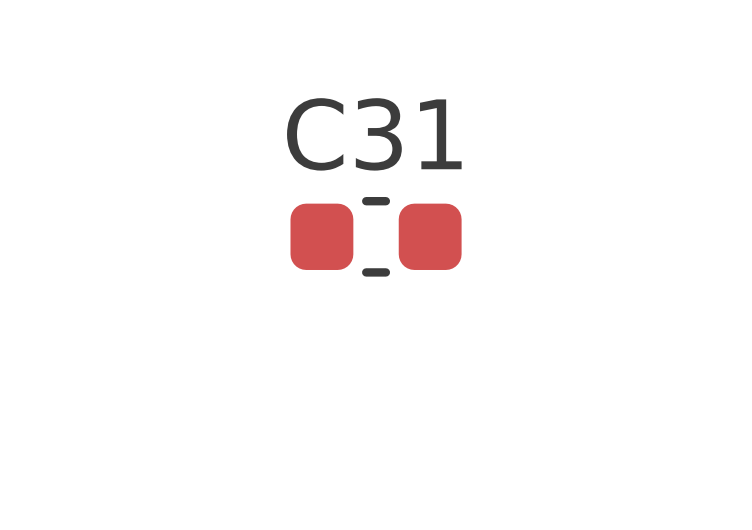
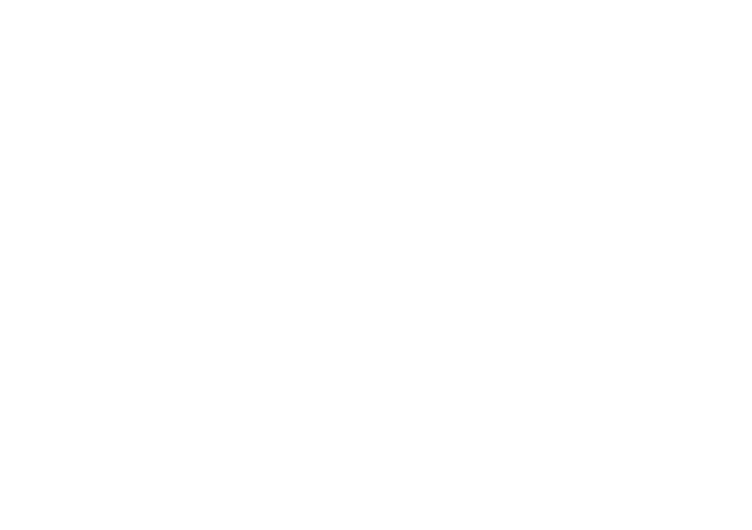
C31: (376, 236) -> none

